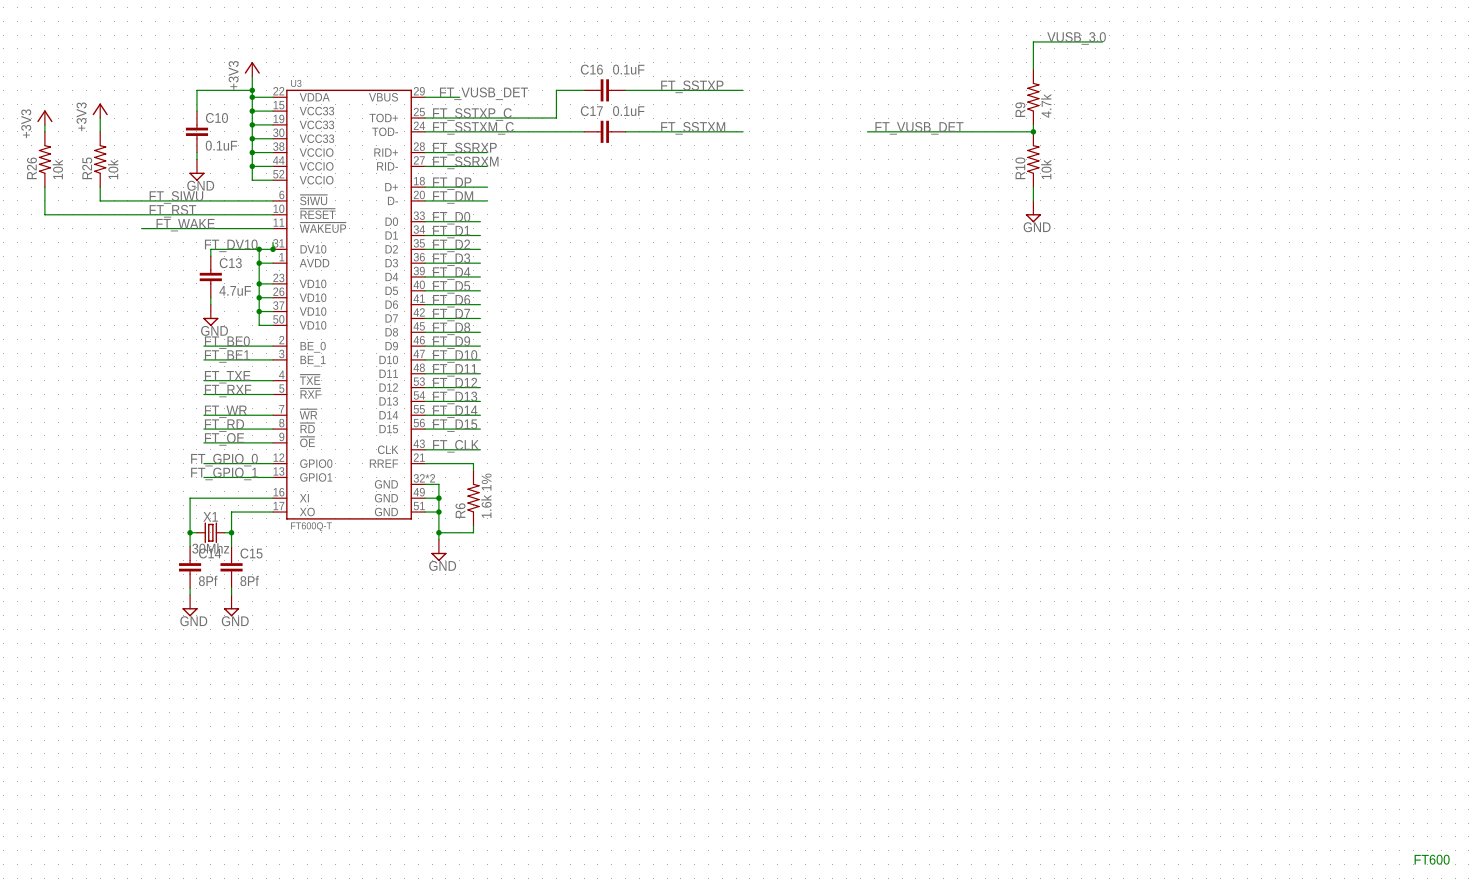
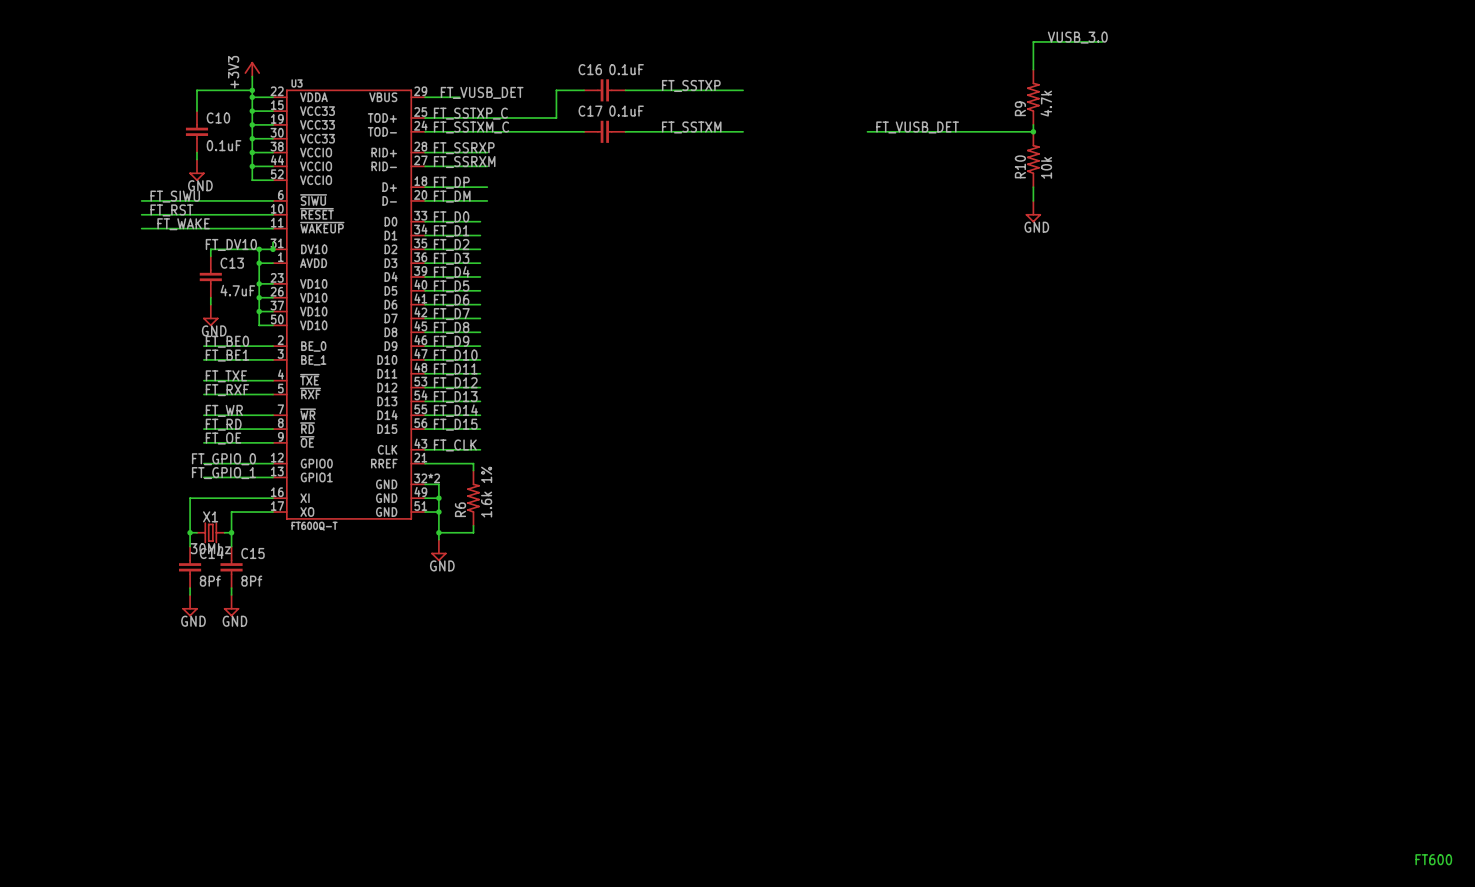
power symbol: +3V3 (100, 110) -> none
power symbol: +3V3 (44, 117) -> none
wire: (100, 118) (100, 131) -> none
wire: (44, 124) (44, 131) -> none
R26: 10k (44, 159) -> none
R25: 10k (100, 159) -> none
wire: (44, 187) (44, 214) (141, 214) -> none
wire: (100, 187) (100, 200) (141, 200) -> none

